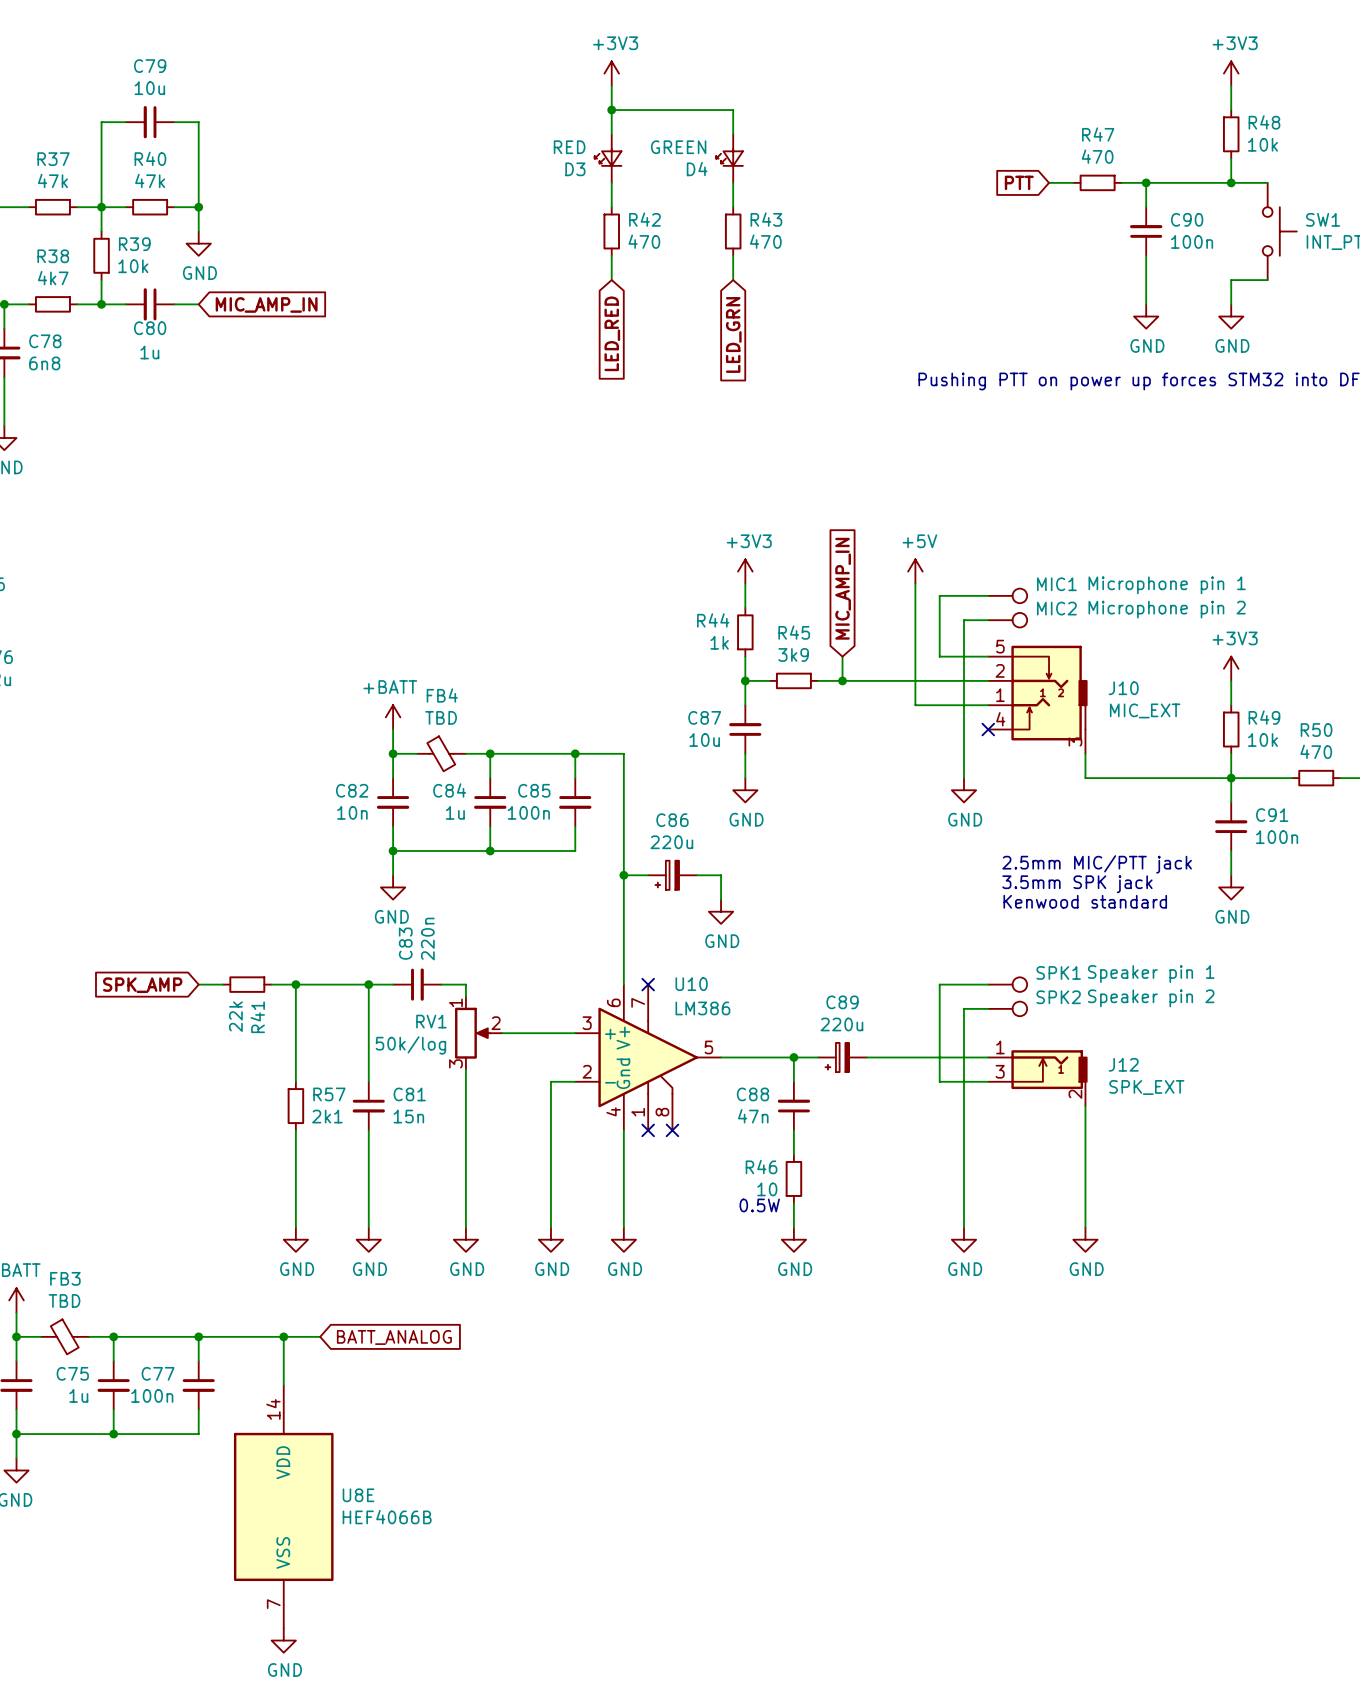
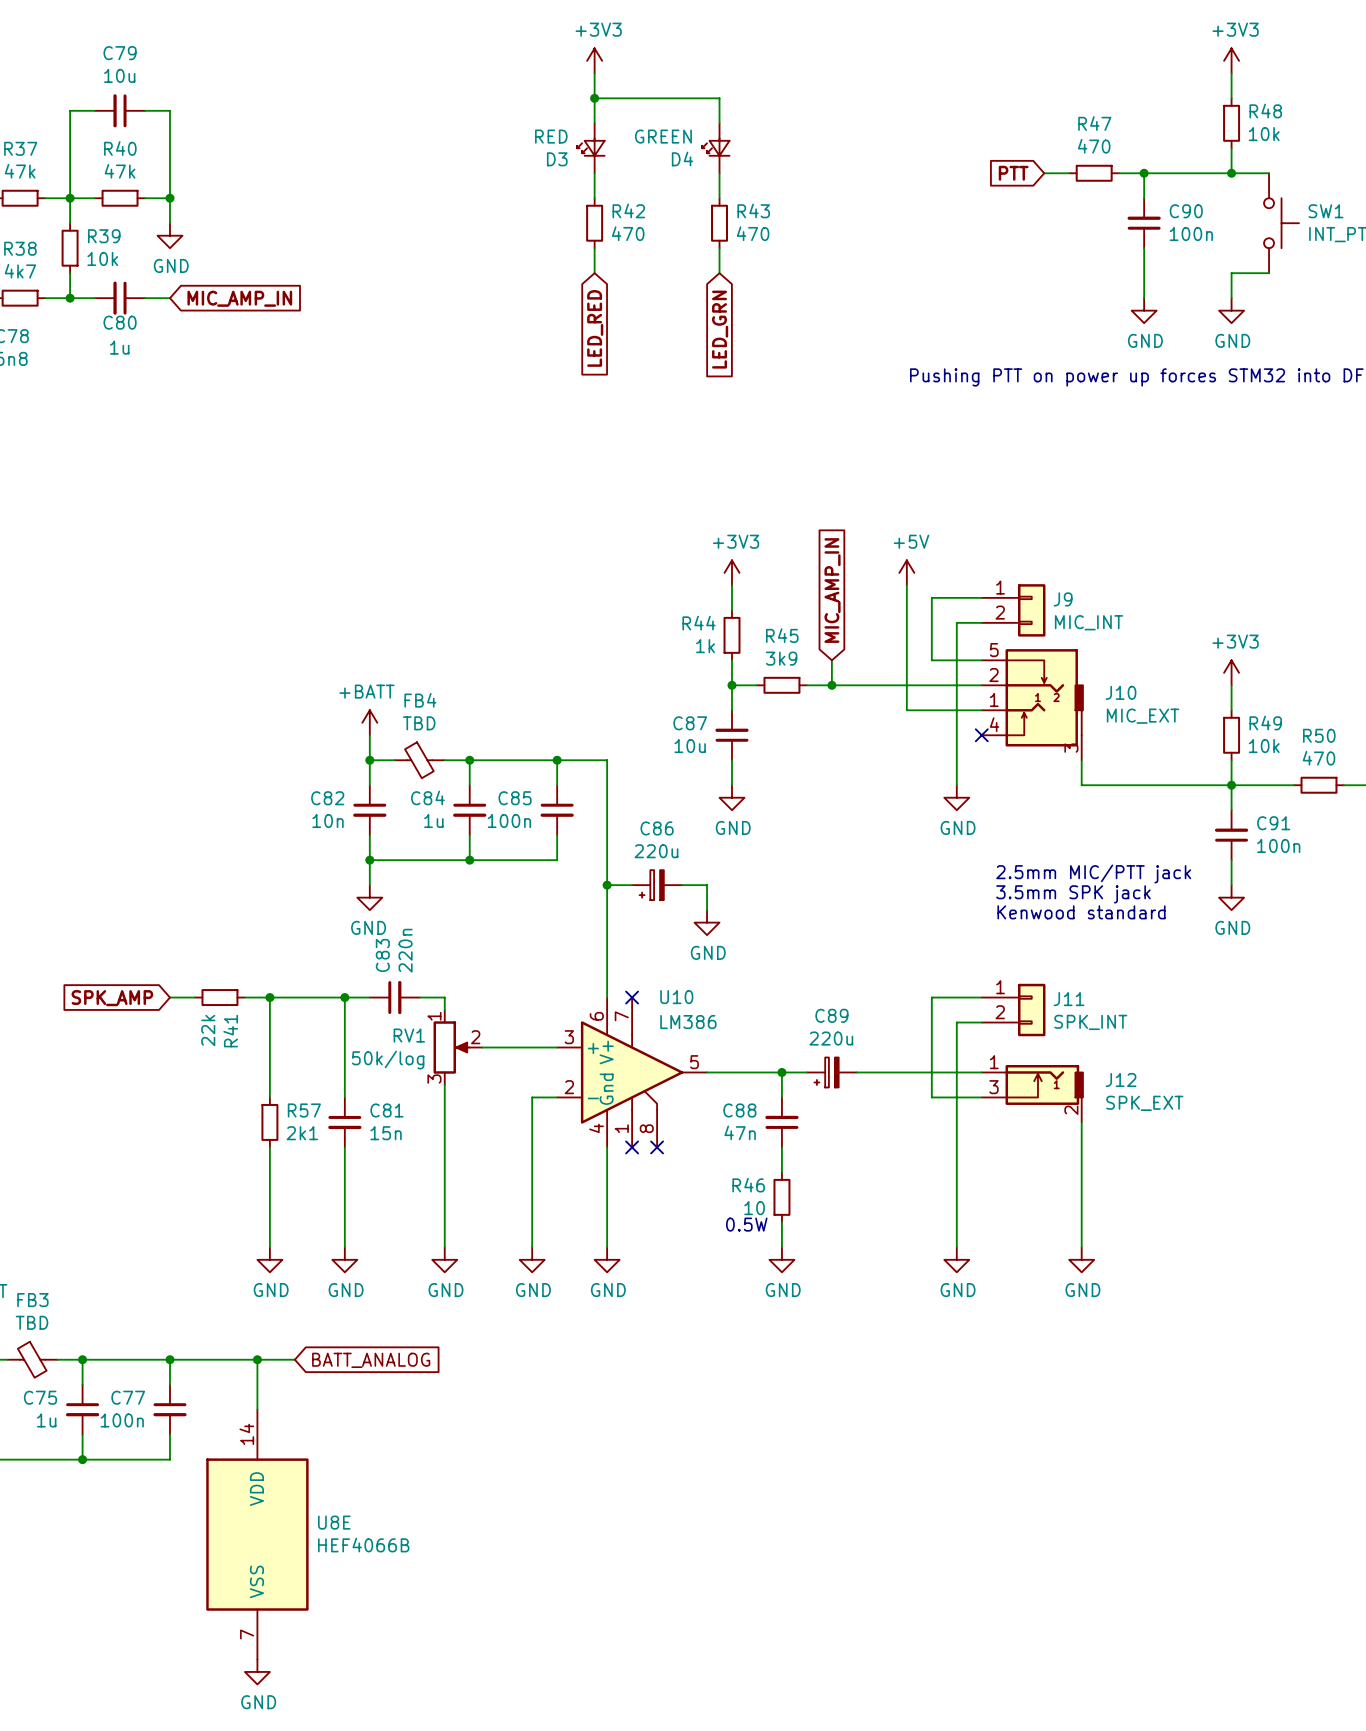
MIC1: Microphone pin 1 (1007, 595) -> none
J9: none -> MIC_INT (1013, 610)
MIC2: Microphone pin 2 (1007, 620) -> none
SPK1: Speaker pin 1 (1007, 984) -> none
J11: none -> SPK_INT (1013, 1010)
SPK2: Speaker pin 2 (1007, 1008) -> none

